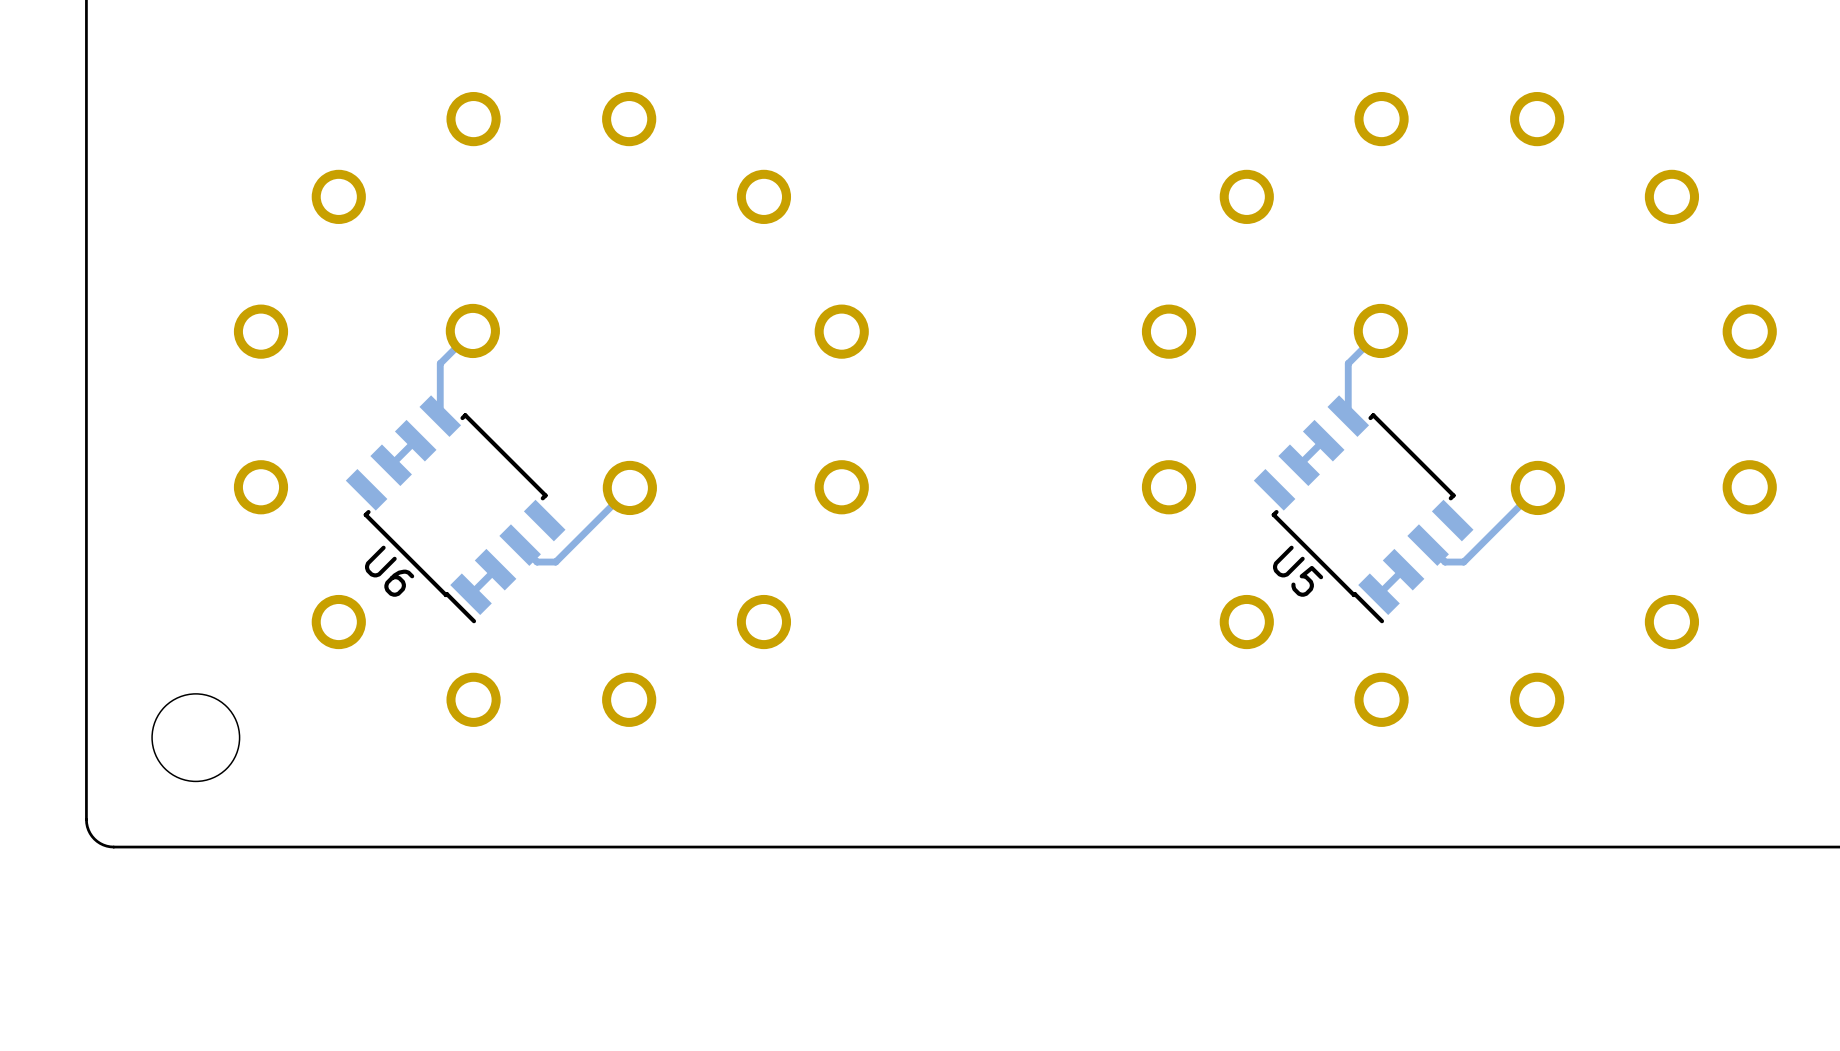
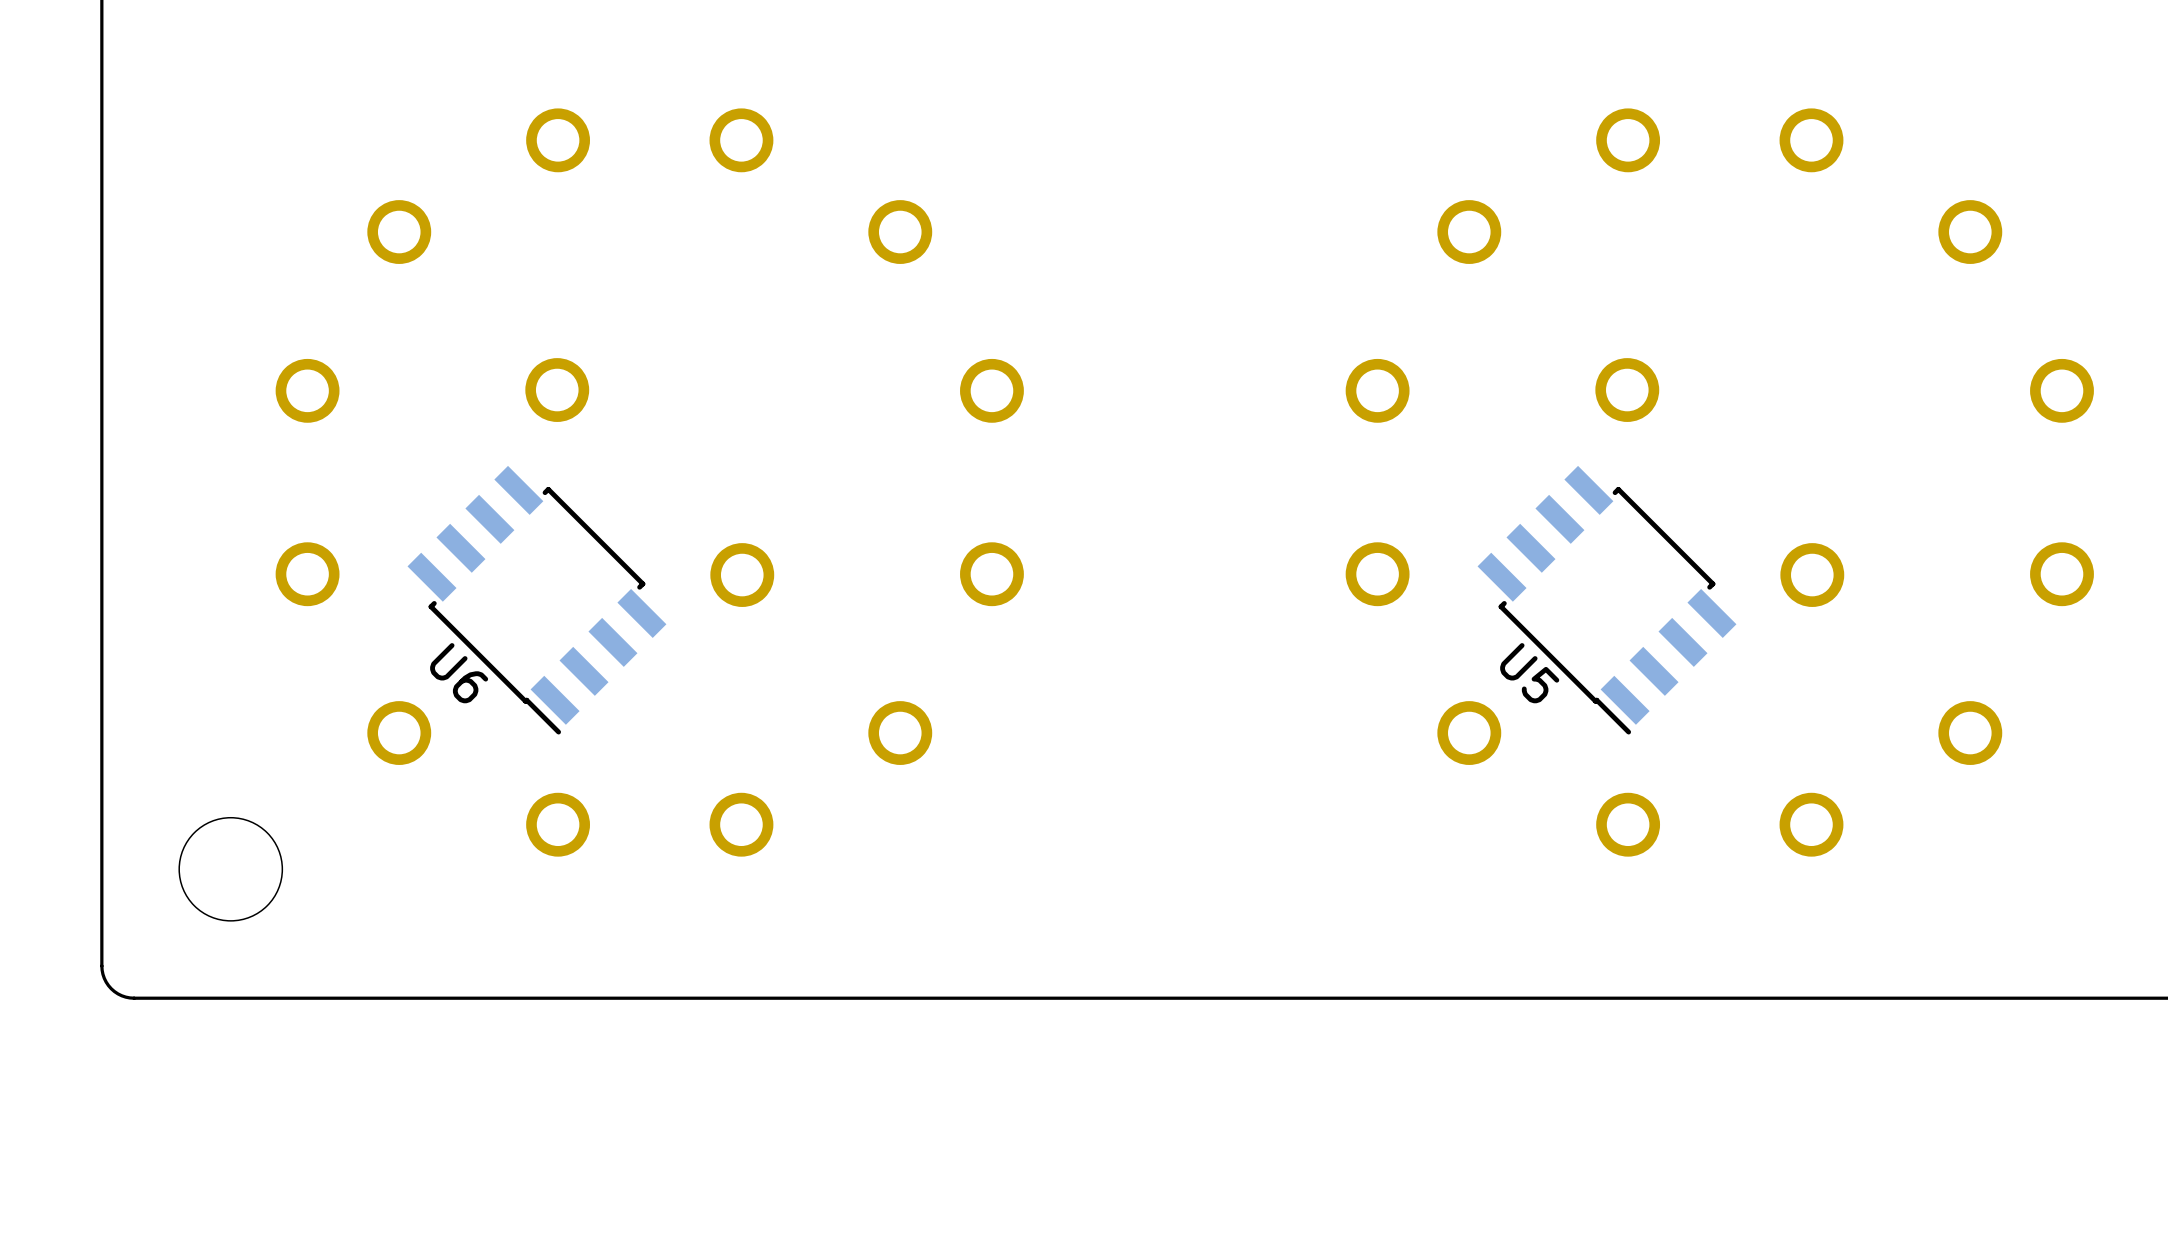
track: (472, 330) (440, 363) (440, 416) -> none
track: (1380, 330) (1348, 363) (1348, 416) -> none
track: (415, 440) (391, 465) -> none
track: (1323, 440) (1299, 465) -> none
track: (629, 487) (555, 562) (537, 562) (520, 545) -> none
track: (1537, 487) (1463, 562) (1445, 562) (1428, 545) -> none
track: (495, 569) (471, 594) -> none
track: (1403, 569) (1379, 594) -> none

